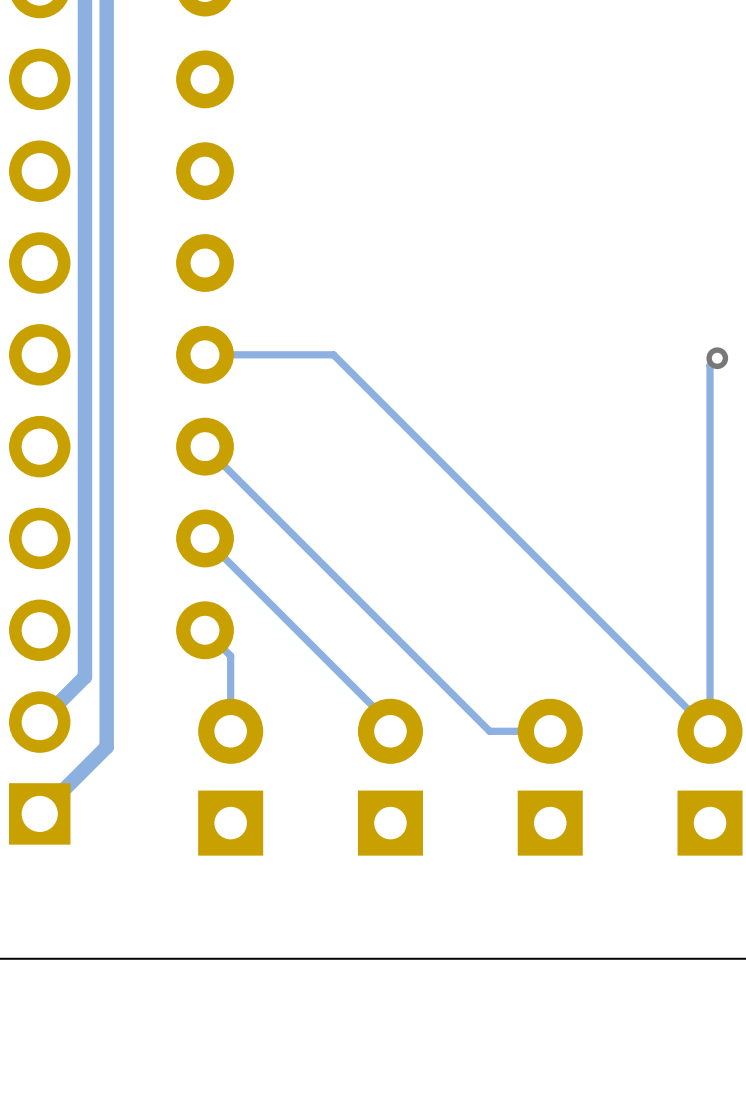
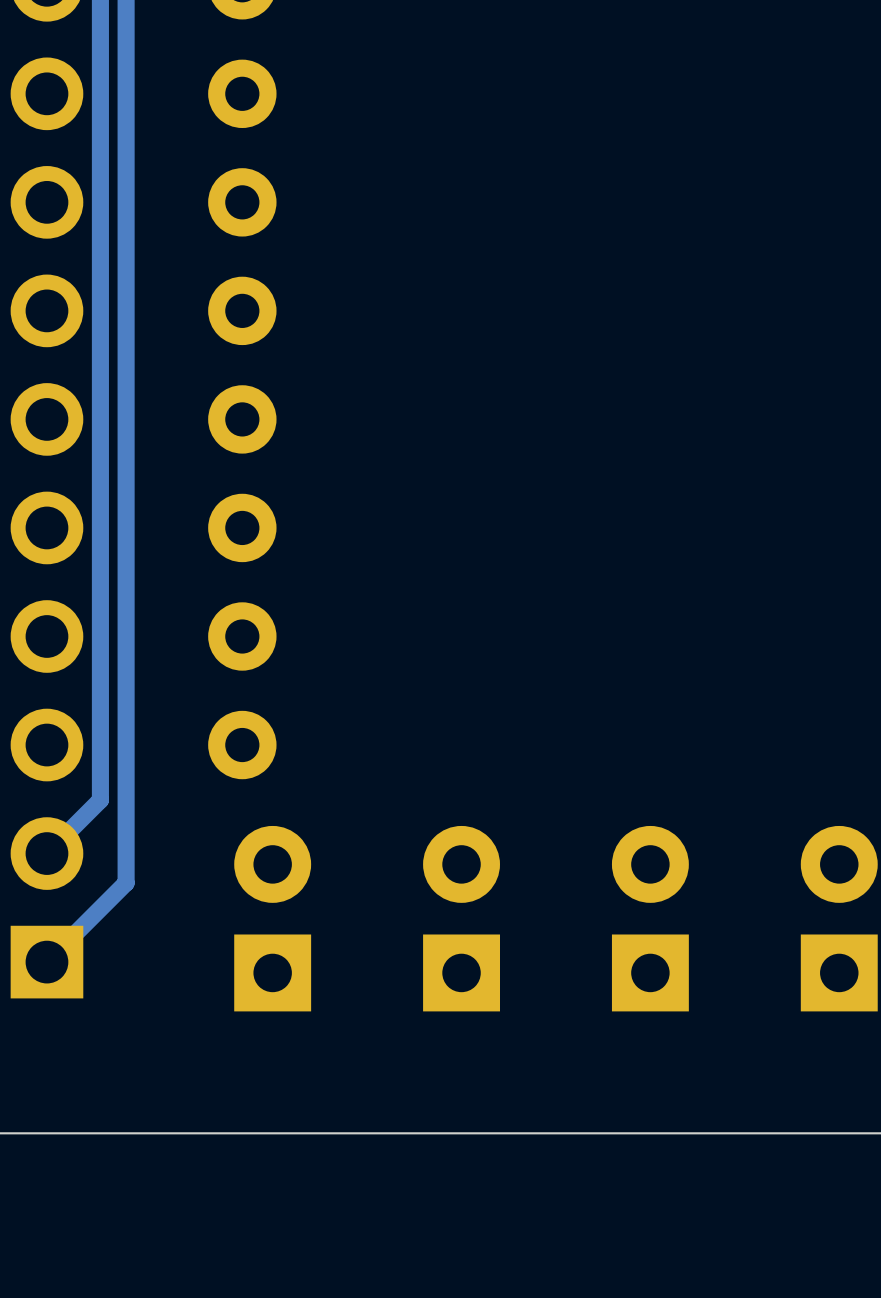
track: (205, 354) (333, 354) (710, 731) (710, 365) (717, 358) -> none
via: (717, 358) -> none
track: (205, 446) (489, 731) (550, 731) -> none
track: (205, 538) (390, 723) (390, 731) -> none
track: (205, 630) (230, 655) (230, 731) -> none

